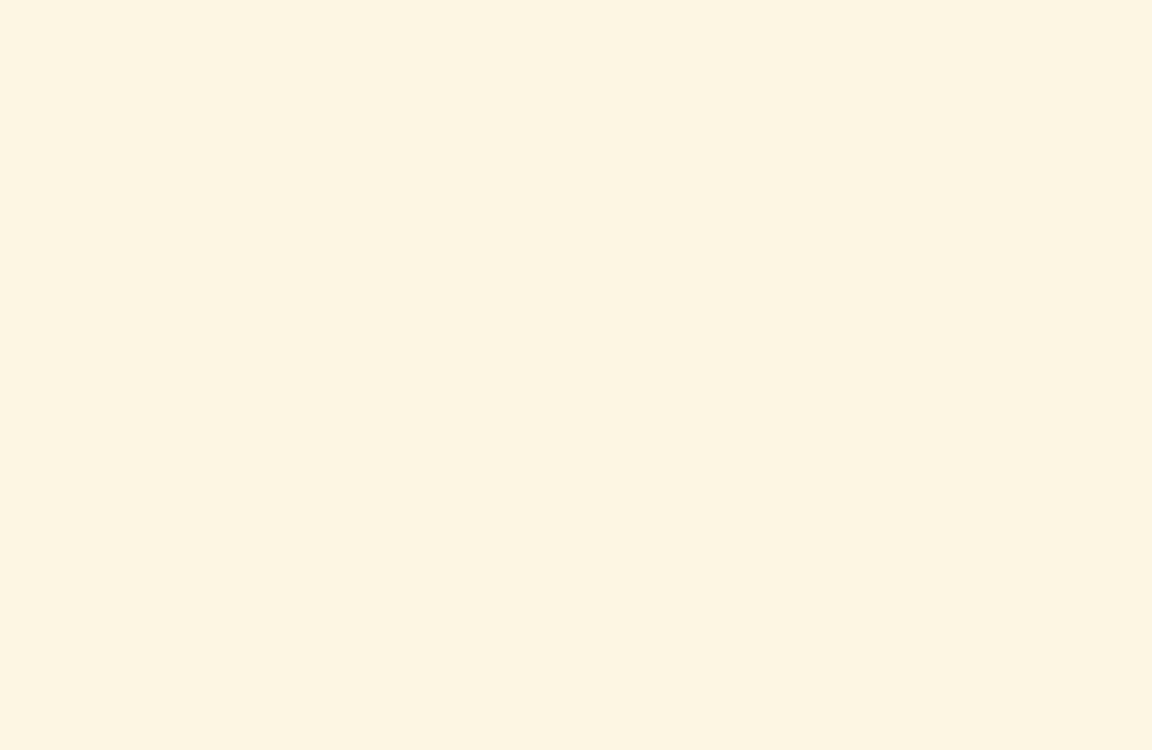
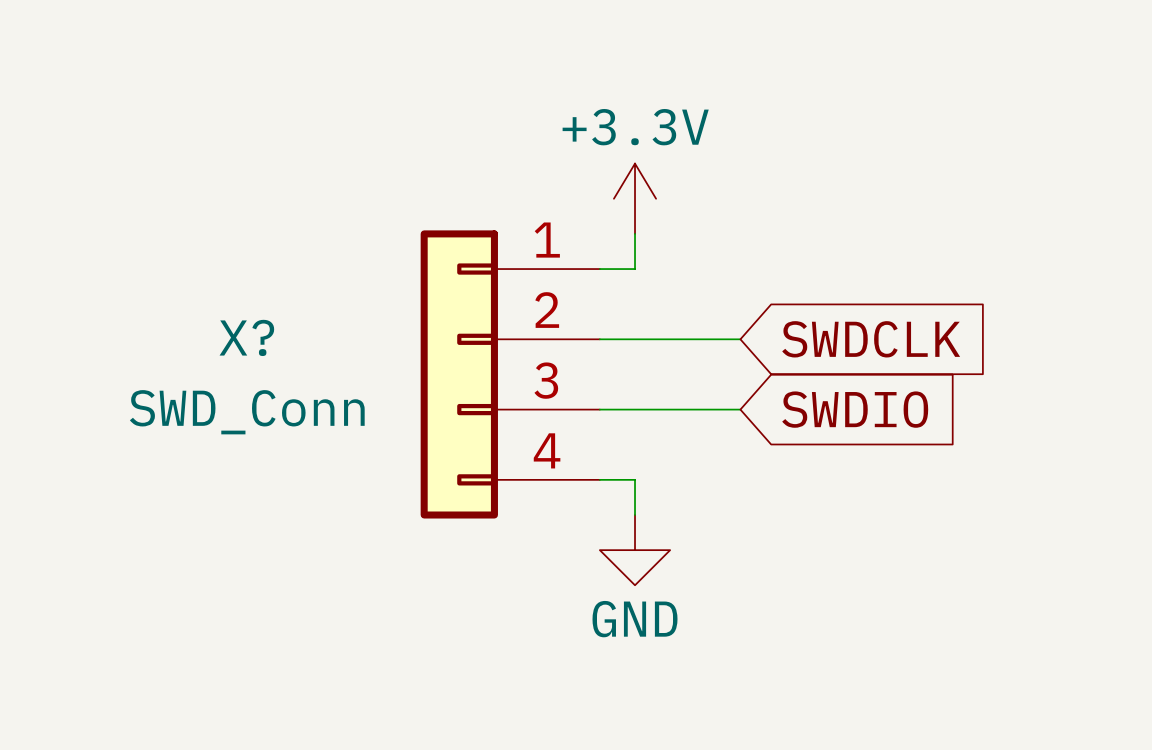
power symbol: none -> +3.3V (635, 198)
wire: none -> (635, 233) (635, 269) (599, 269)
wire: none -> (599, 339) (740, 339)
global label: none -> SWDCLK (871, 339)
X?: none -> SWD_Conn (510, 374)
wire: none -> (599, 409) (740, 409)
global label: none -> SWDIO (855, 409)
wire: none -> (599, 479) (635, 479) (635, 515)
power symbol: none -> GND (635, 550)

